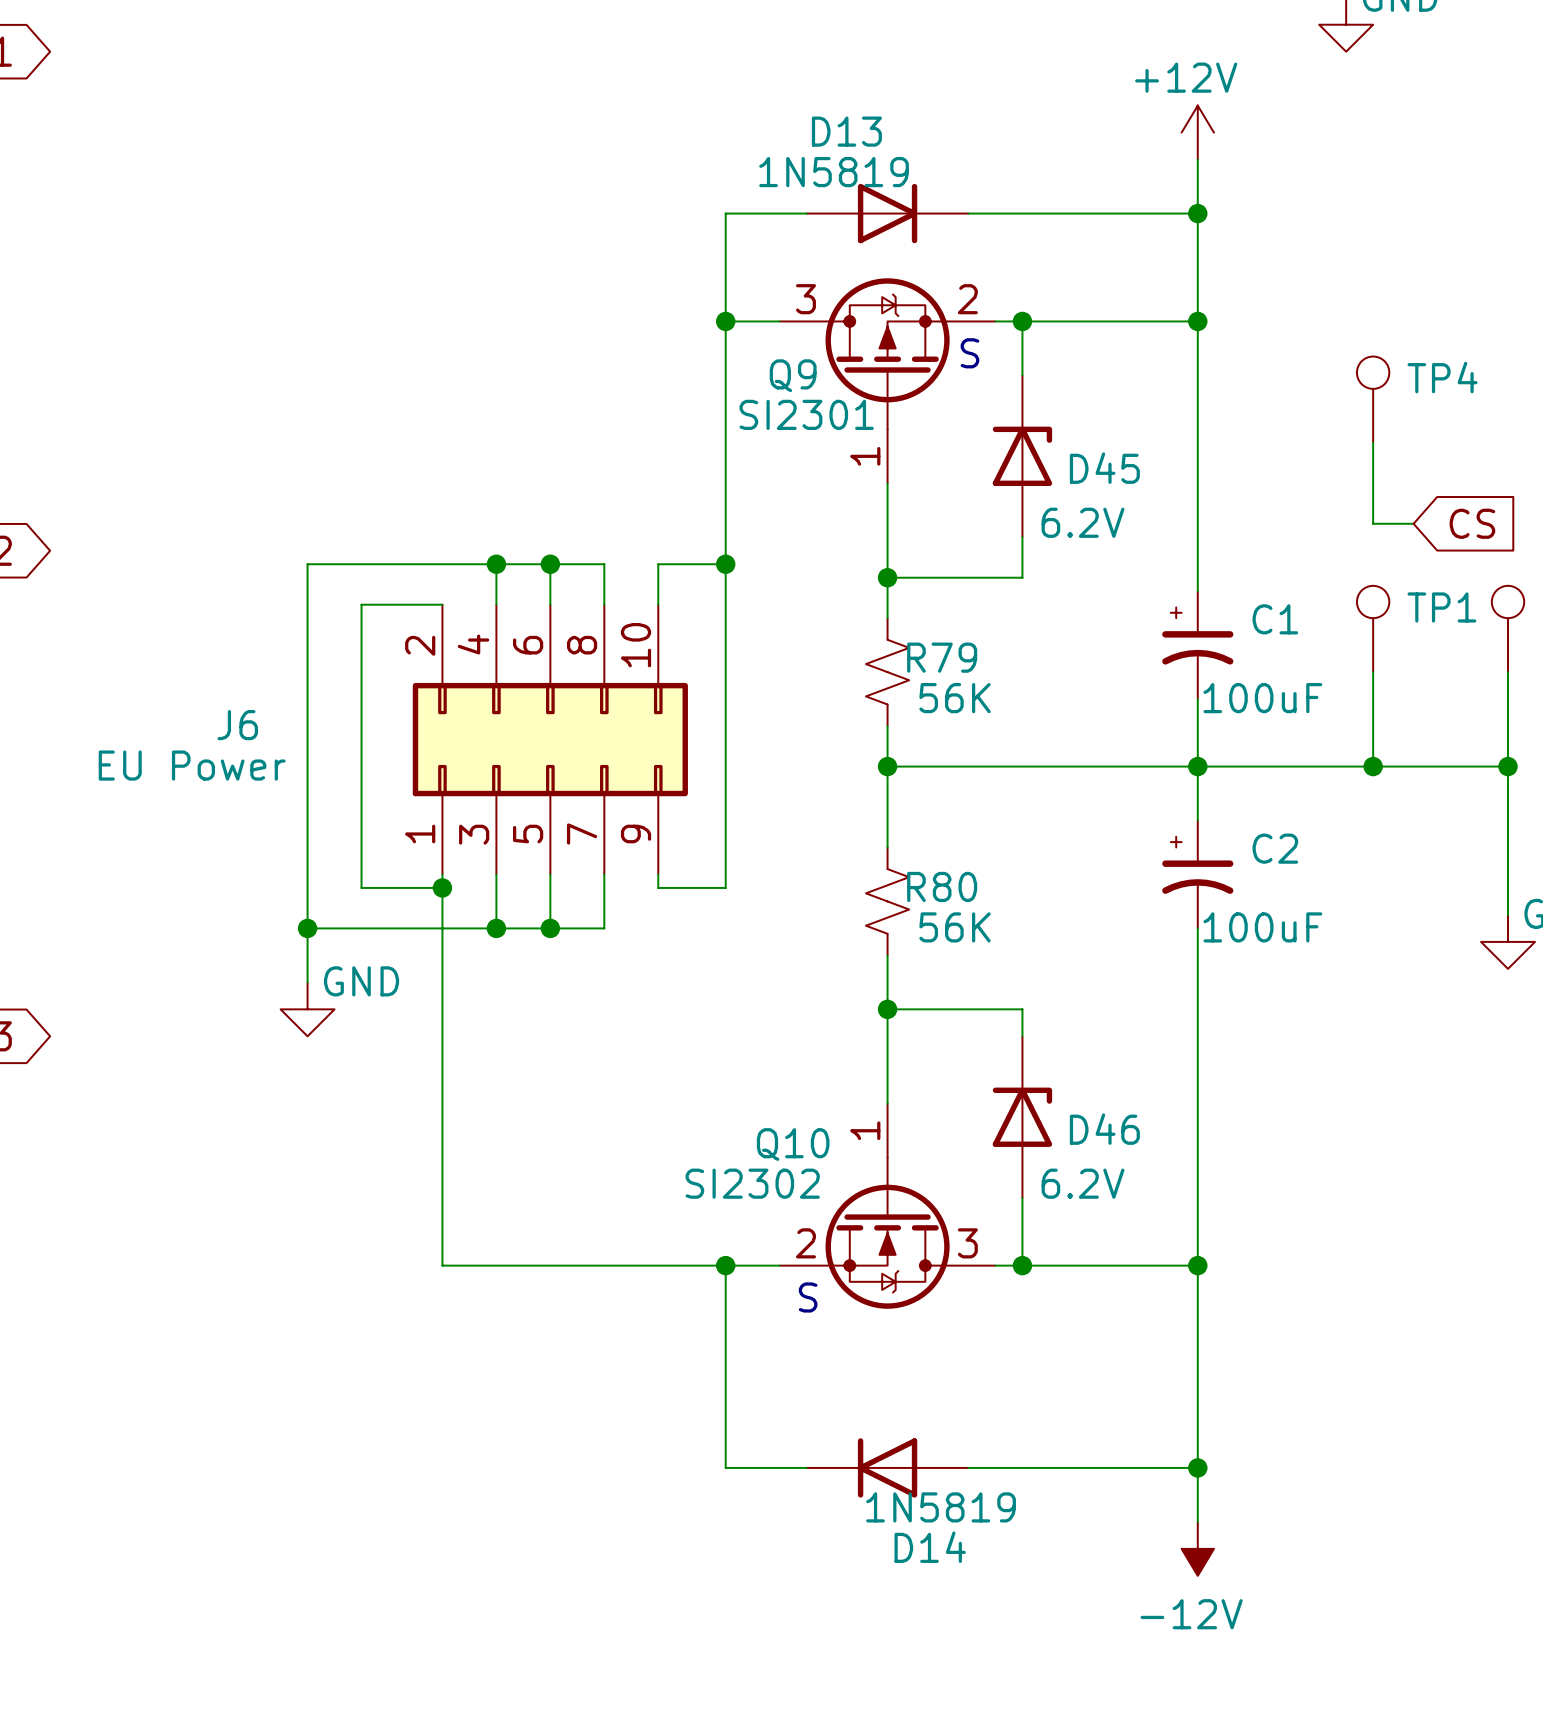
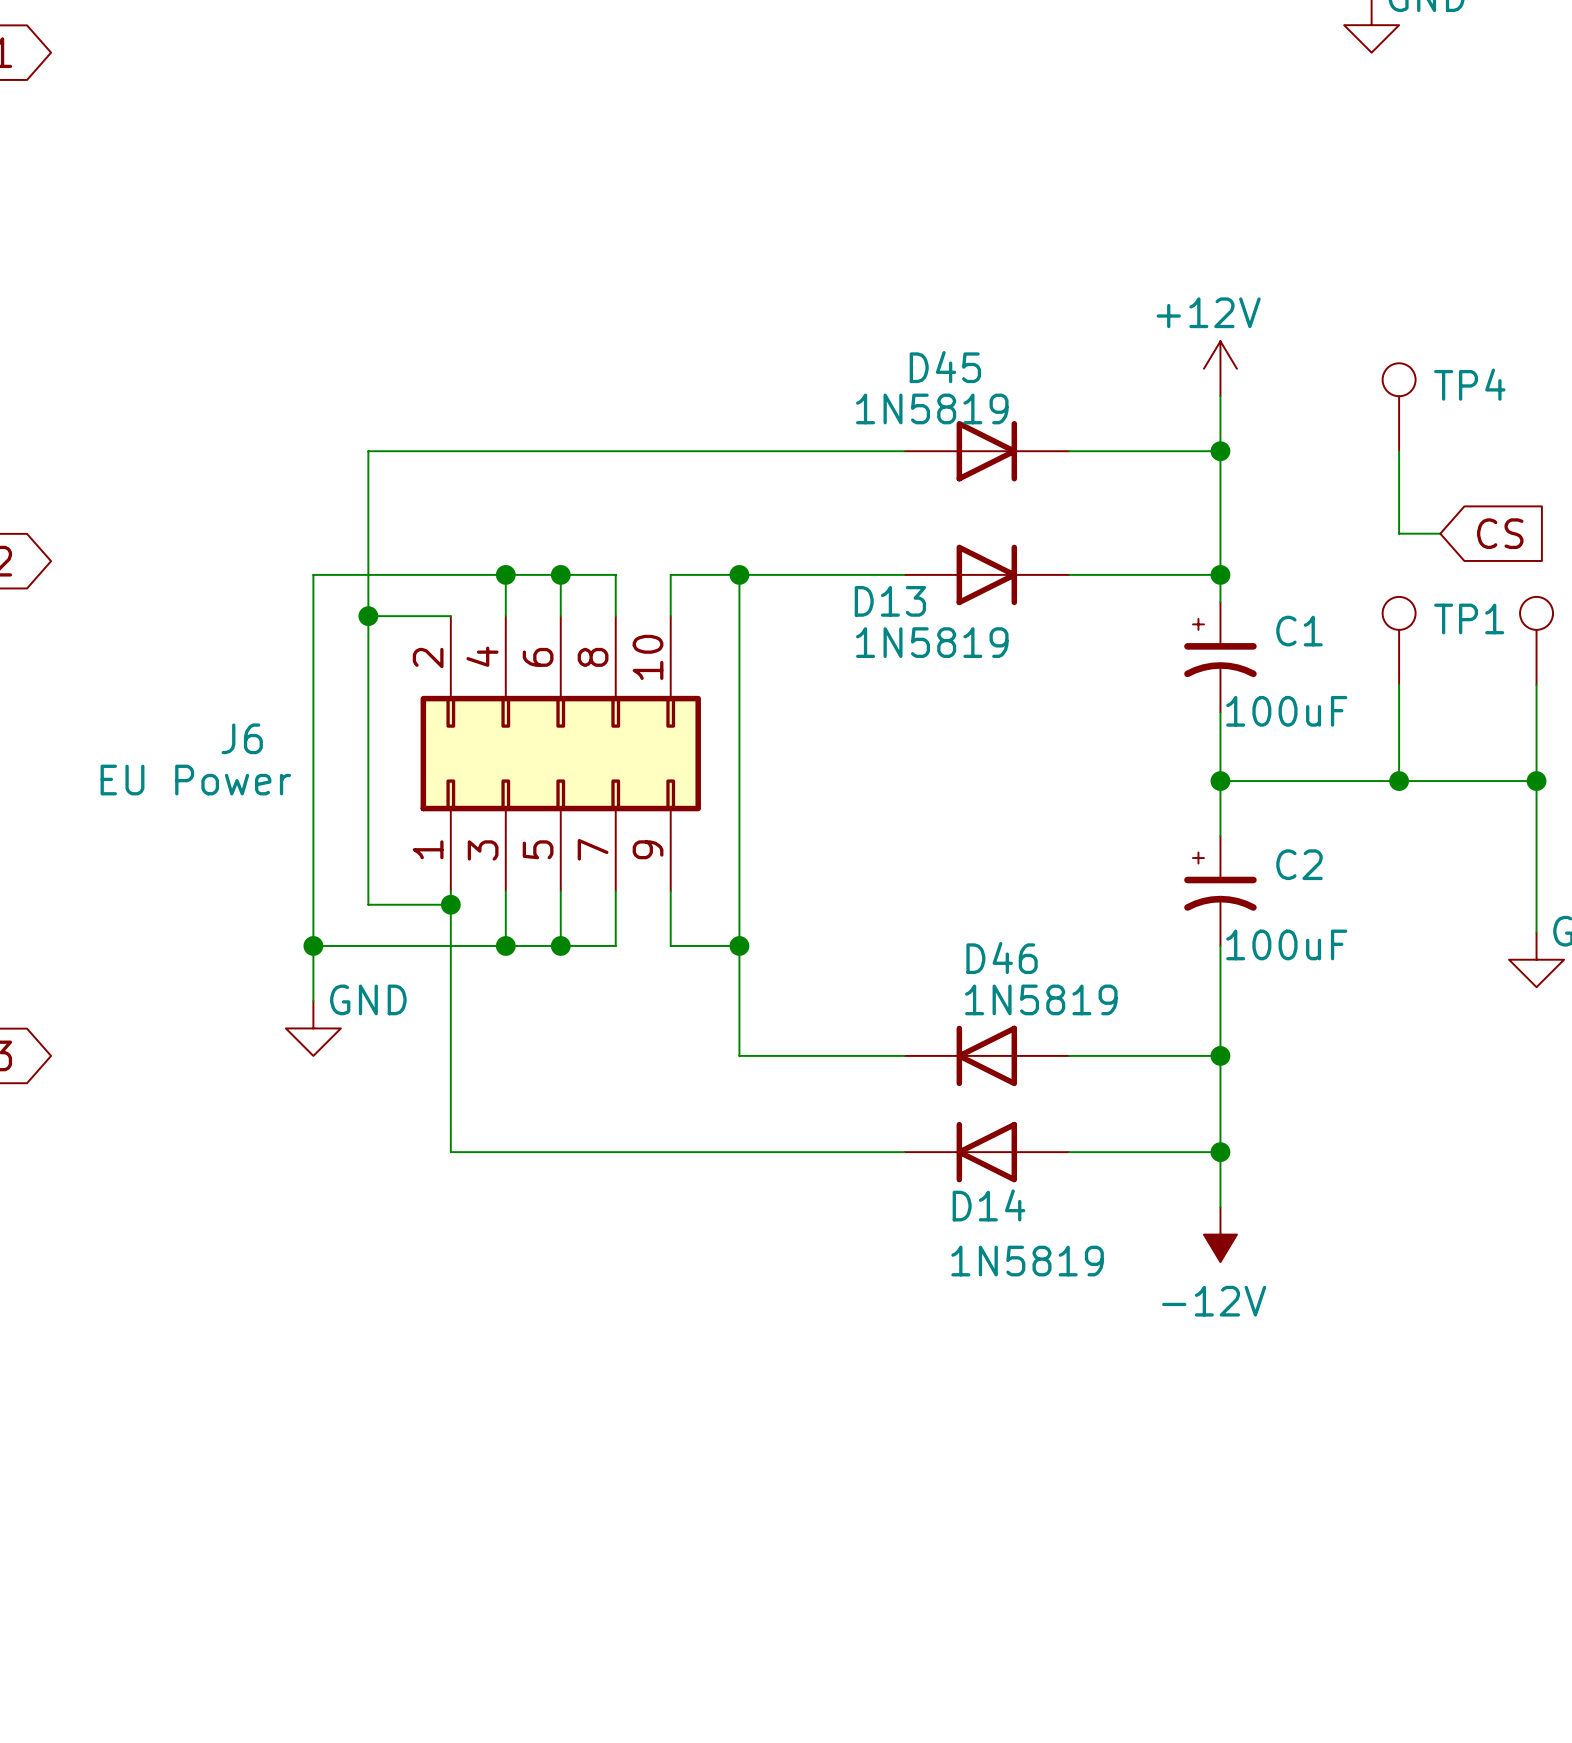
D13 name position: D13 (846, 131) -> D13 (890, 601)
power symbol position: +12V (1197, 132) -> +12V (1220, 368)
wire: (1197, 159) (1197, 388) -> none
D13 value position: 1N5819 (834, 172) -> 1N5819 (932, 642)
wire: (806, 213) (725, 213) (725, 564) -> (904, 574) (739, 574)
D13 position: (887, 213) -> (986, 574)
wire: (968, 213) (1197, 213) -> none
junction: (1197, 213) -> none
wire: (725, 321) (779, 321) -> none
junction: (725, 321) -> none
wire: (995, 321) (1197, 321) -> none
wire: (1022, 321) (1022, 375) -> none
junction: (1022, 321) -> none
junction: (1197, 321) -> none
text: S (969, 353) -> none
D45 symbol: [992, 375, 1053, 538] -> [904, 420, 1070, 482]
Q9: SI2301 (887, 380) -> none
wire: none -> (904, 451) (368, 451) (368, 616)
wire: none -> (1069, 451) (1220, 451)
junction: none -> (1220, 451)
D45 name position: D45 (1104, 468) -> D45 (945, 367)
wire: (887, 483) (887, 618) -> none
D45 value: 6.2V (1083, 522) -> 1N5819 (932, 408)
wire: (1022, 537) (1022, 577) (887, 577) -> none
wire: none -> (1069, 574) (1220, 574)
junction: none -> (1220, 574)
junction: (887, 577) -> none
junction: none -> (368, 616)
R79: 56K (887, 672) -> none
wire: (887, 726) (887, 847) -> none
wire: (887, 766) (1197, 766) -> none
junction: (887, 766) -> none
wire: (658, 887) (725, 887) -> (670, 904) (670, 945) (739, 945)
wire: none -> (739, 904) (739, 1055) (904, 1055)
R80: 56K (887, 901) -> none
junction: none -> (739, 945)
wire: (887, 955) (887, 1103) -> none
wire: (887, 1009) (1022, 1009) (1022, 1036) -> none
junction: (887, 1009) -> none
D46 symbol: [992, 1036, 1053, 1199] -> [904, 1025, 1070, 1087]
wire: none -> (1069, 1055) (1220, 1055)
junction: none -> (1220, 1055)
D46 name position: D46 (1104, 1129) -> D46 (1002, 958)
wire: (442, 1130) (442, 1265) (779, 1265) -> (450, 1152) (904, 1152)
wire: none -> (1069, 1152) (1220, 1152)
junction: none -> (1220, 1152)
D46 value: 6.2V (1083, 1183) -> 1N5819 (1041, 999)
wire: (1197, 1184) (1197, 1521) -> none
wire: (1022, 1198) (1022, 1265) -> none
Q10: SI2302 (887, 1206) -> none
wire: (725, 1265) (725, 1467) (806, 1467) -> none
junction: (725, 1265) -> none
wire: (995, 1265) (1197, 1265) -> none
junction: (1022, 1265) -> none
junction: (1197, 1265) -> none
text: S (808, 1297) -> none
D14 position: (887, 1467) -> (986, 1152)
wire: (968, 1467) (1197, 1467) -> none
junction: (1197, 1467) -> none
D14 value position: 1N5819 (941, 1507) -> 1N5819 (1027, 1261)
D14 name position: D14 (930, 1547) -> D14 (988, 1205)
power symbol position: -12V (1197, 1548) -> -12V (1220, 1234)

